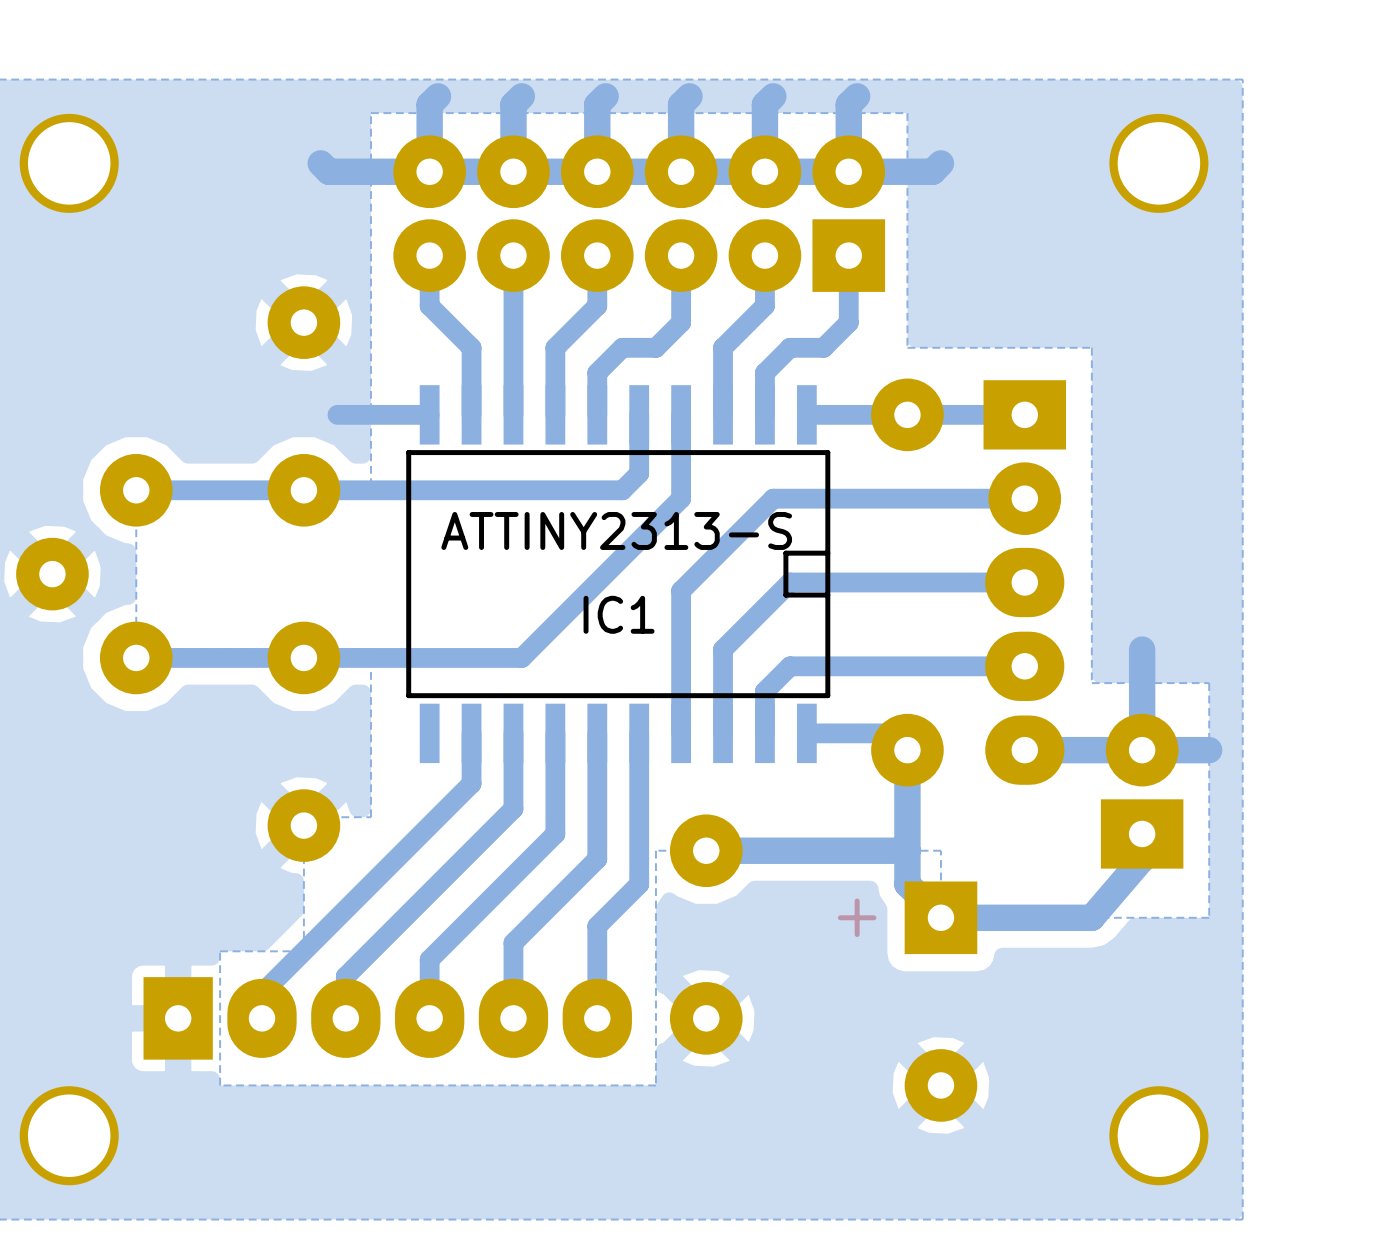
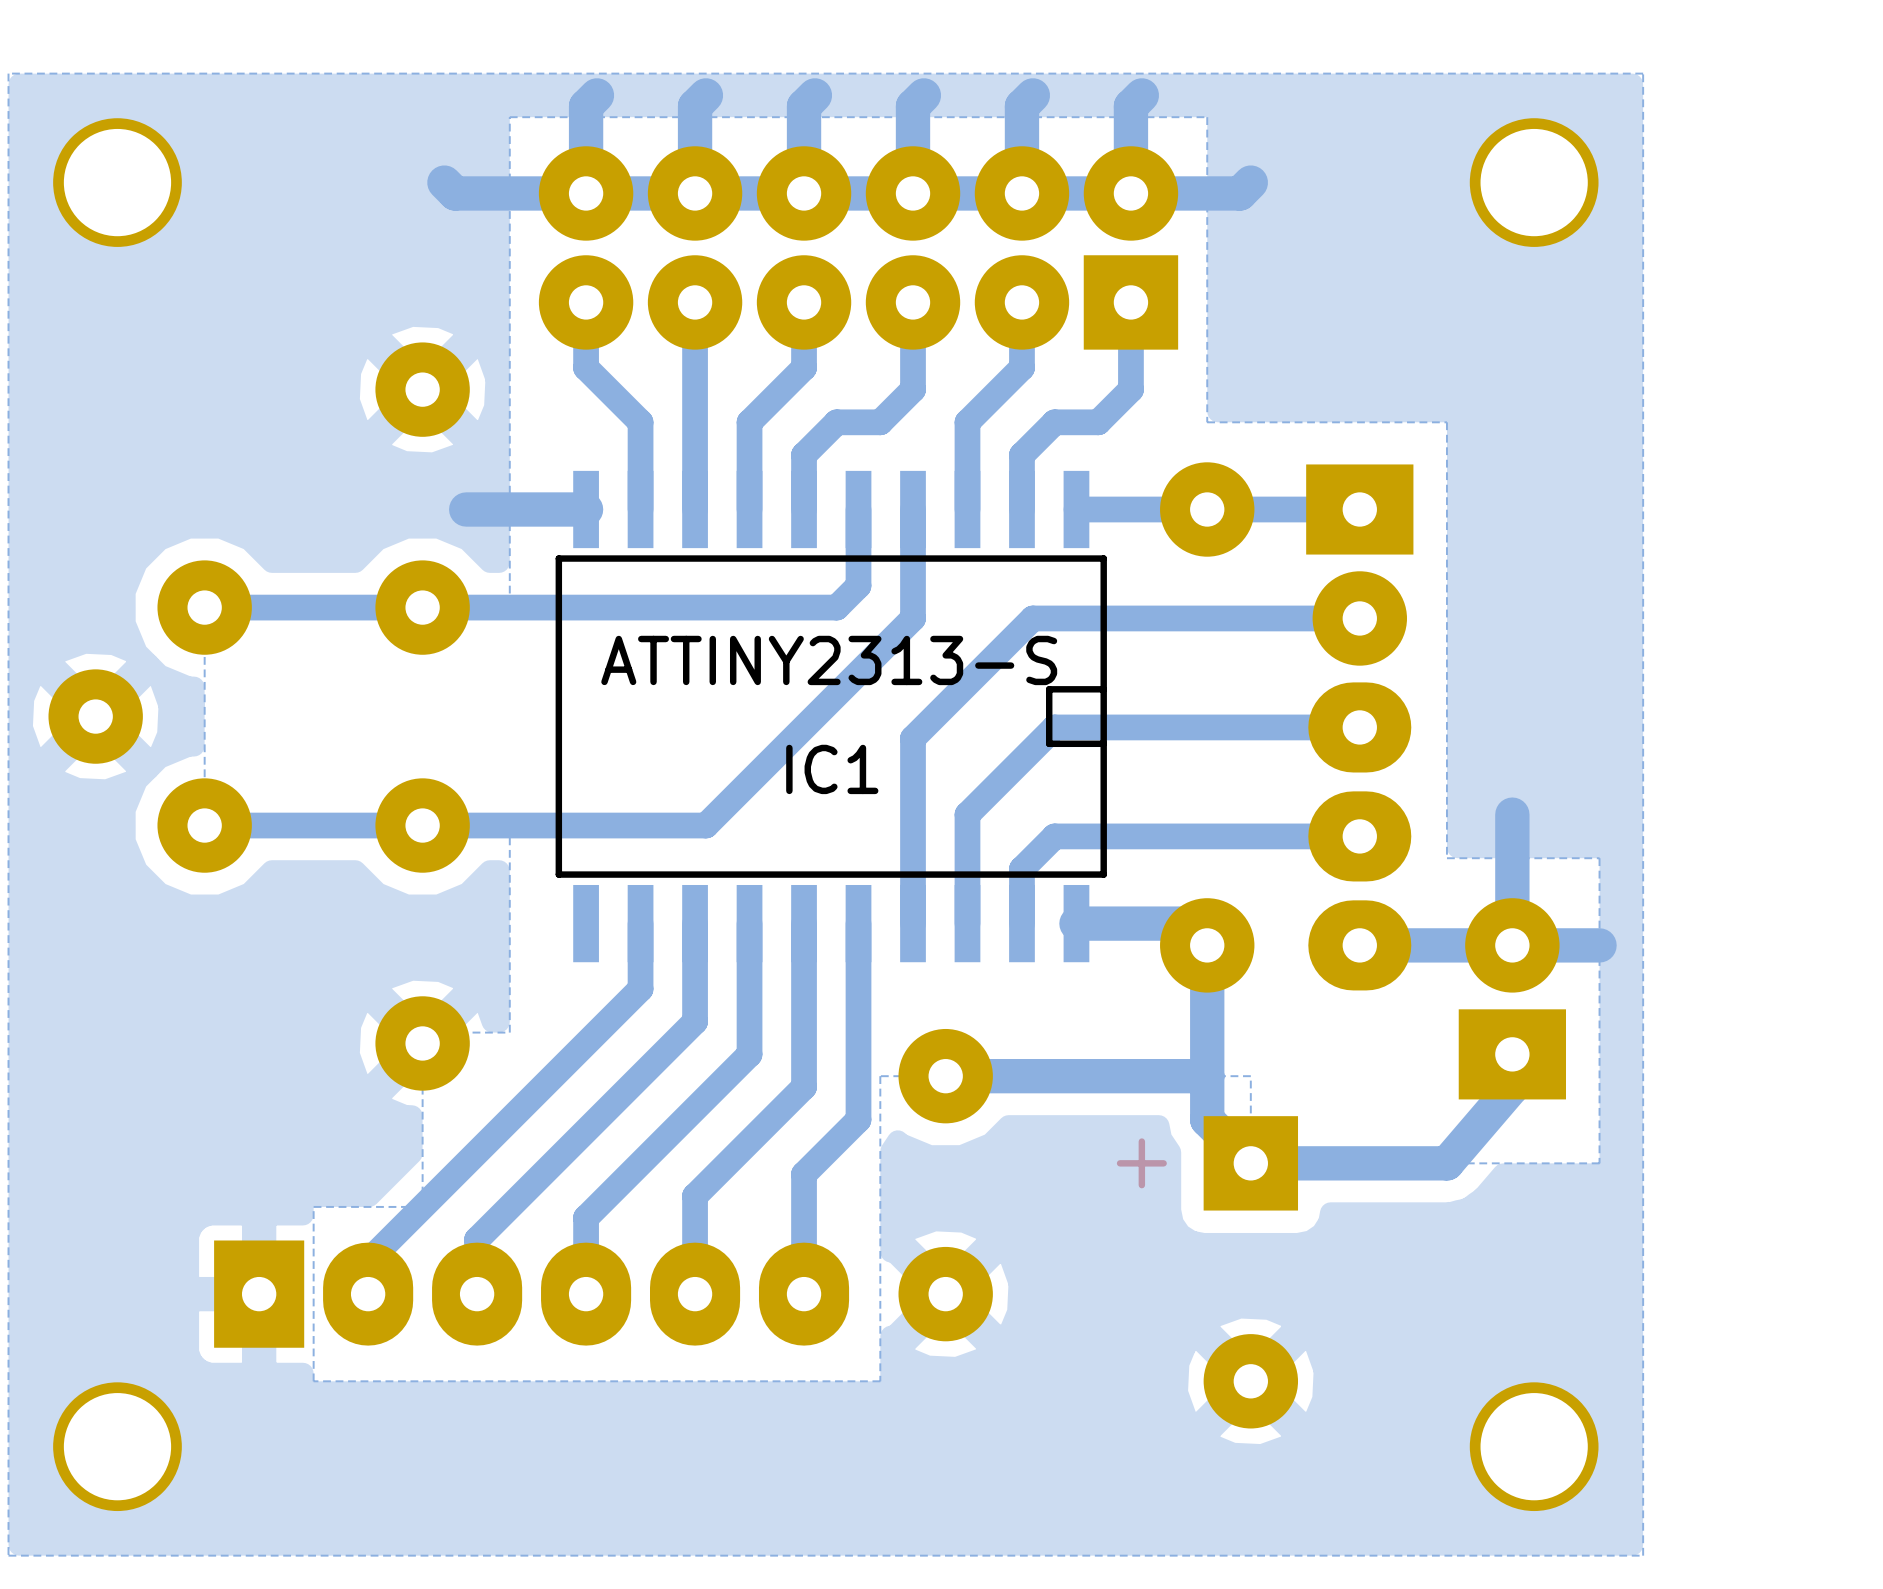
bottom track width: thin (429, 414) (337, 414) -> thick (586, 509) (466, 509)
bottom track width: thin (890, 733) (806, 733) -> thick (1185, 923) (1076, 923)

